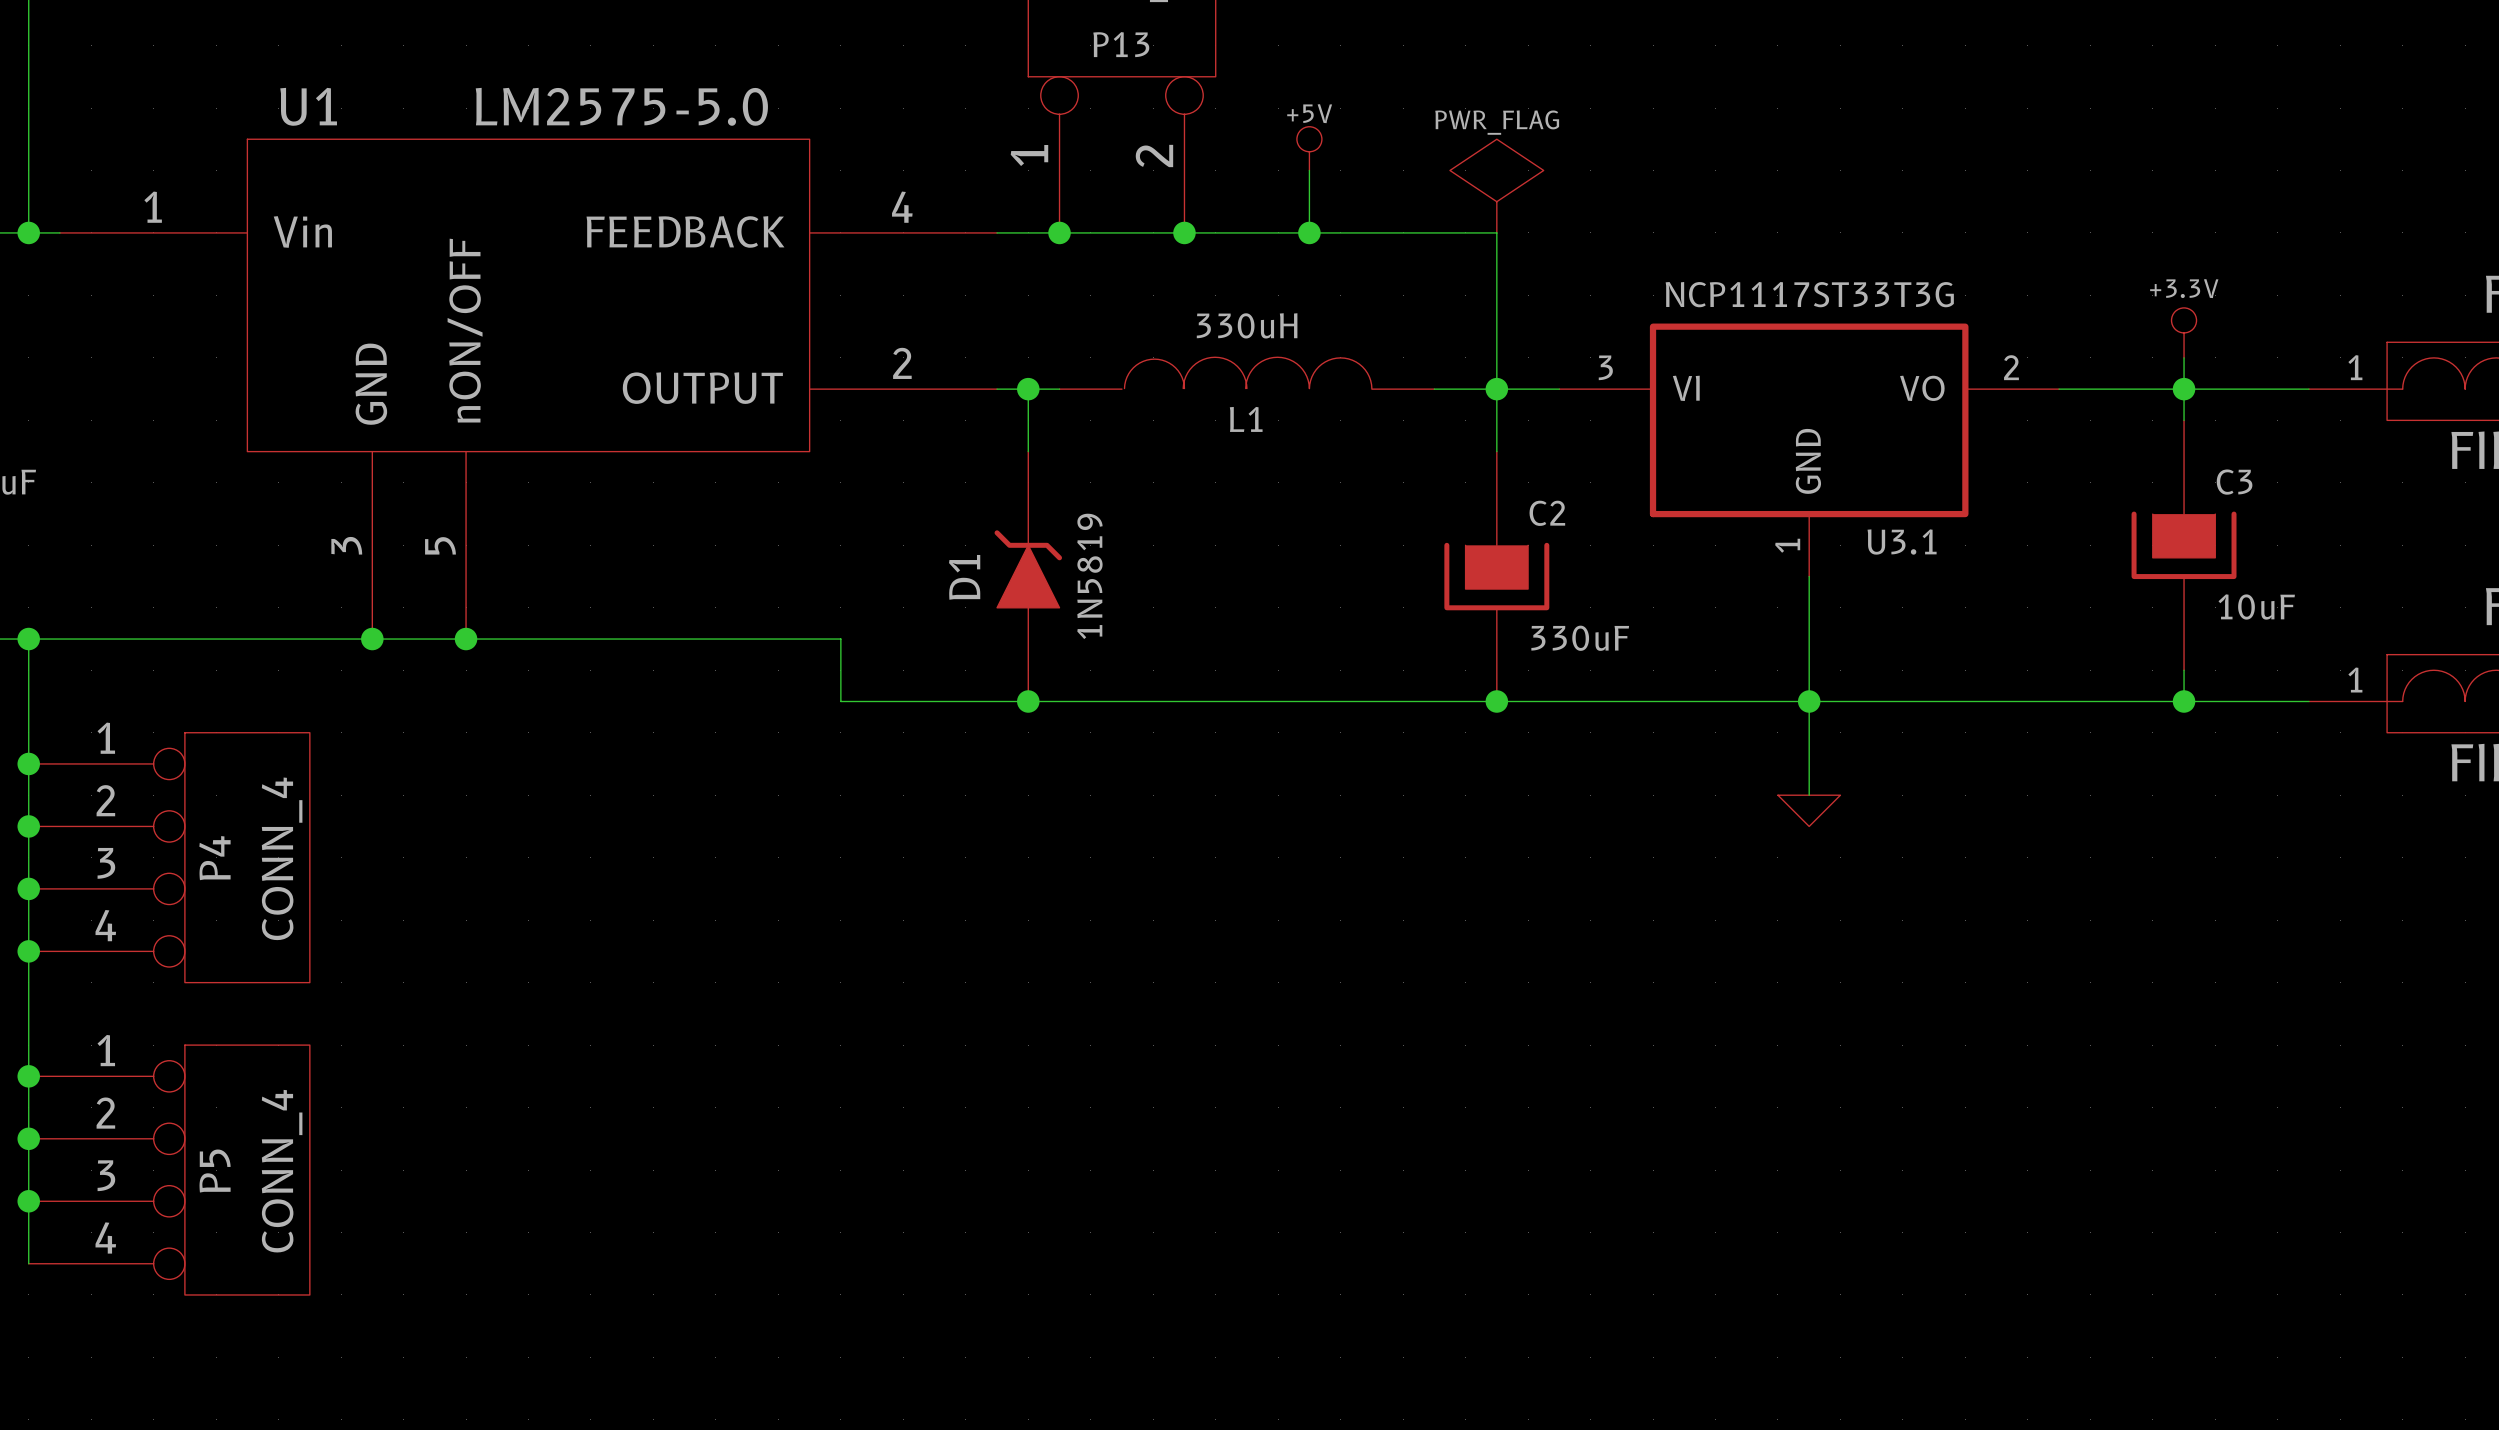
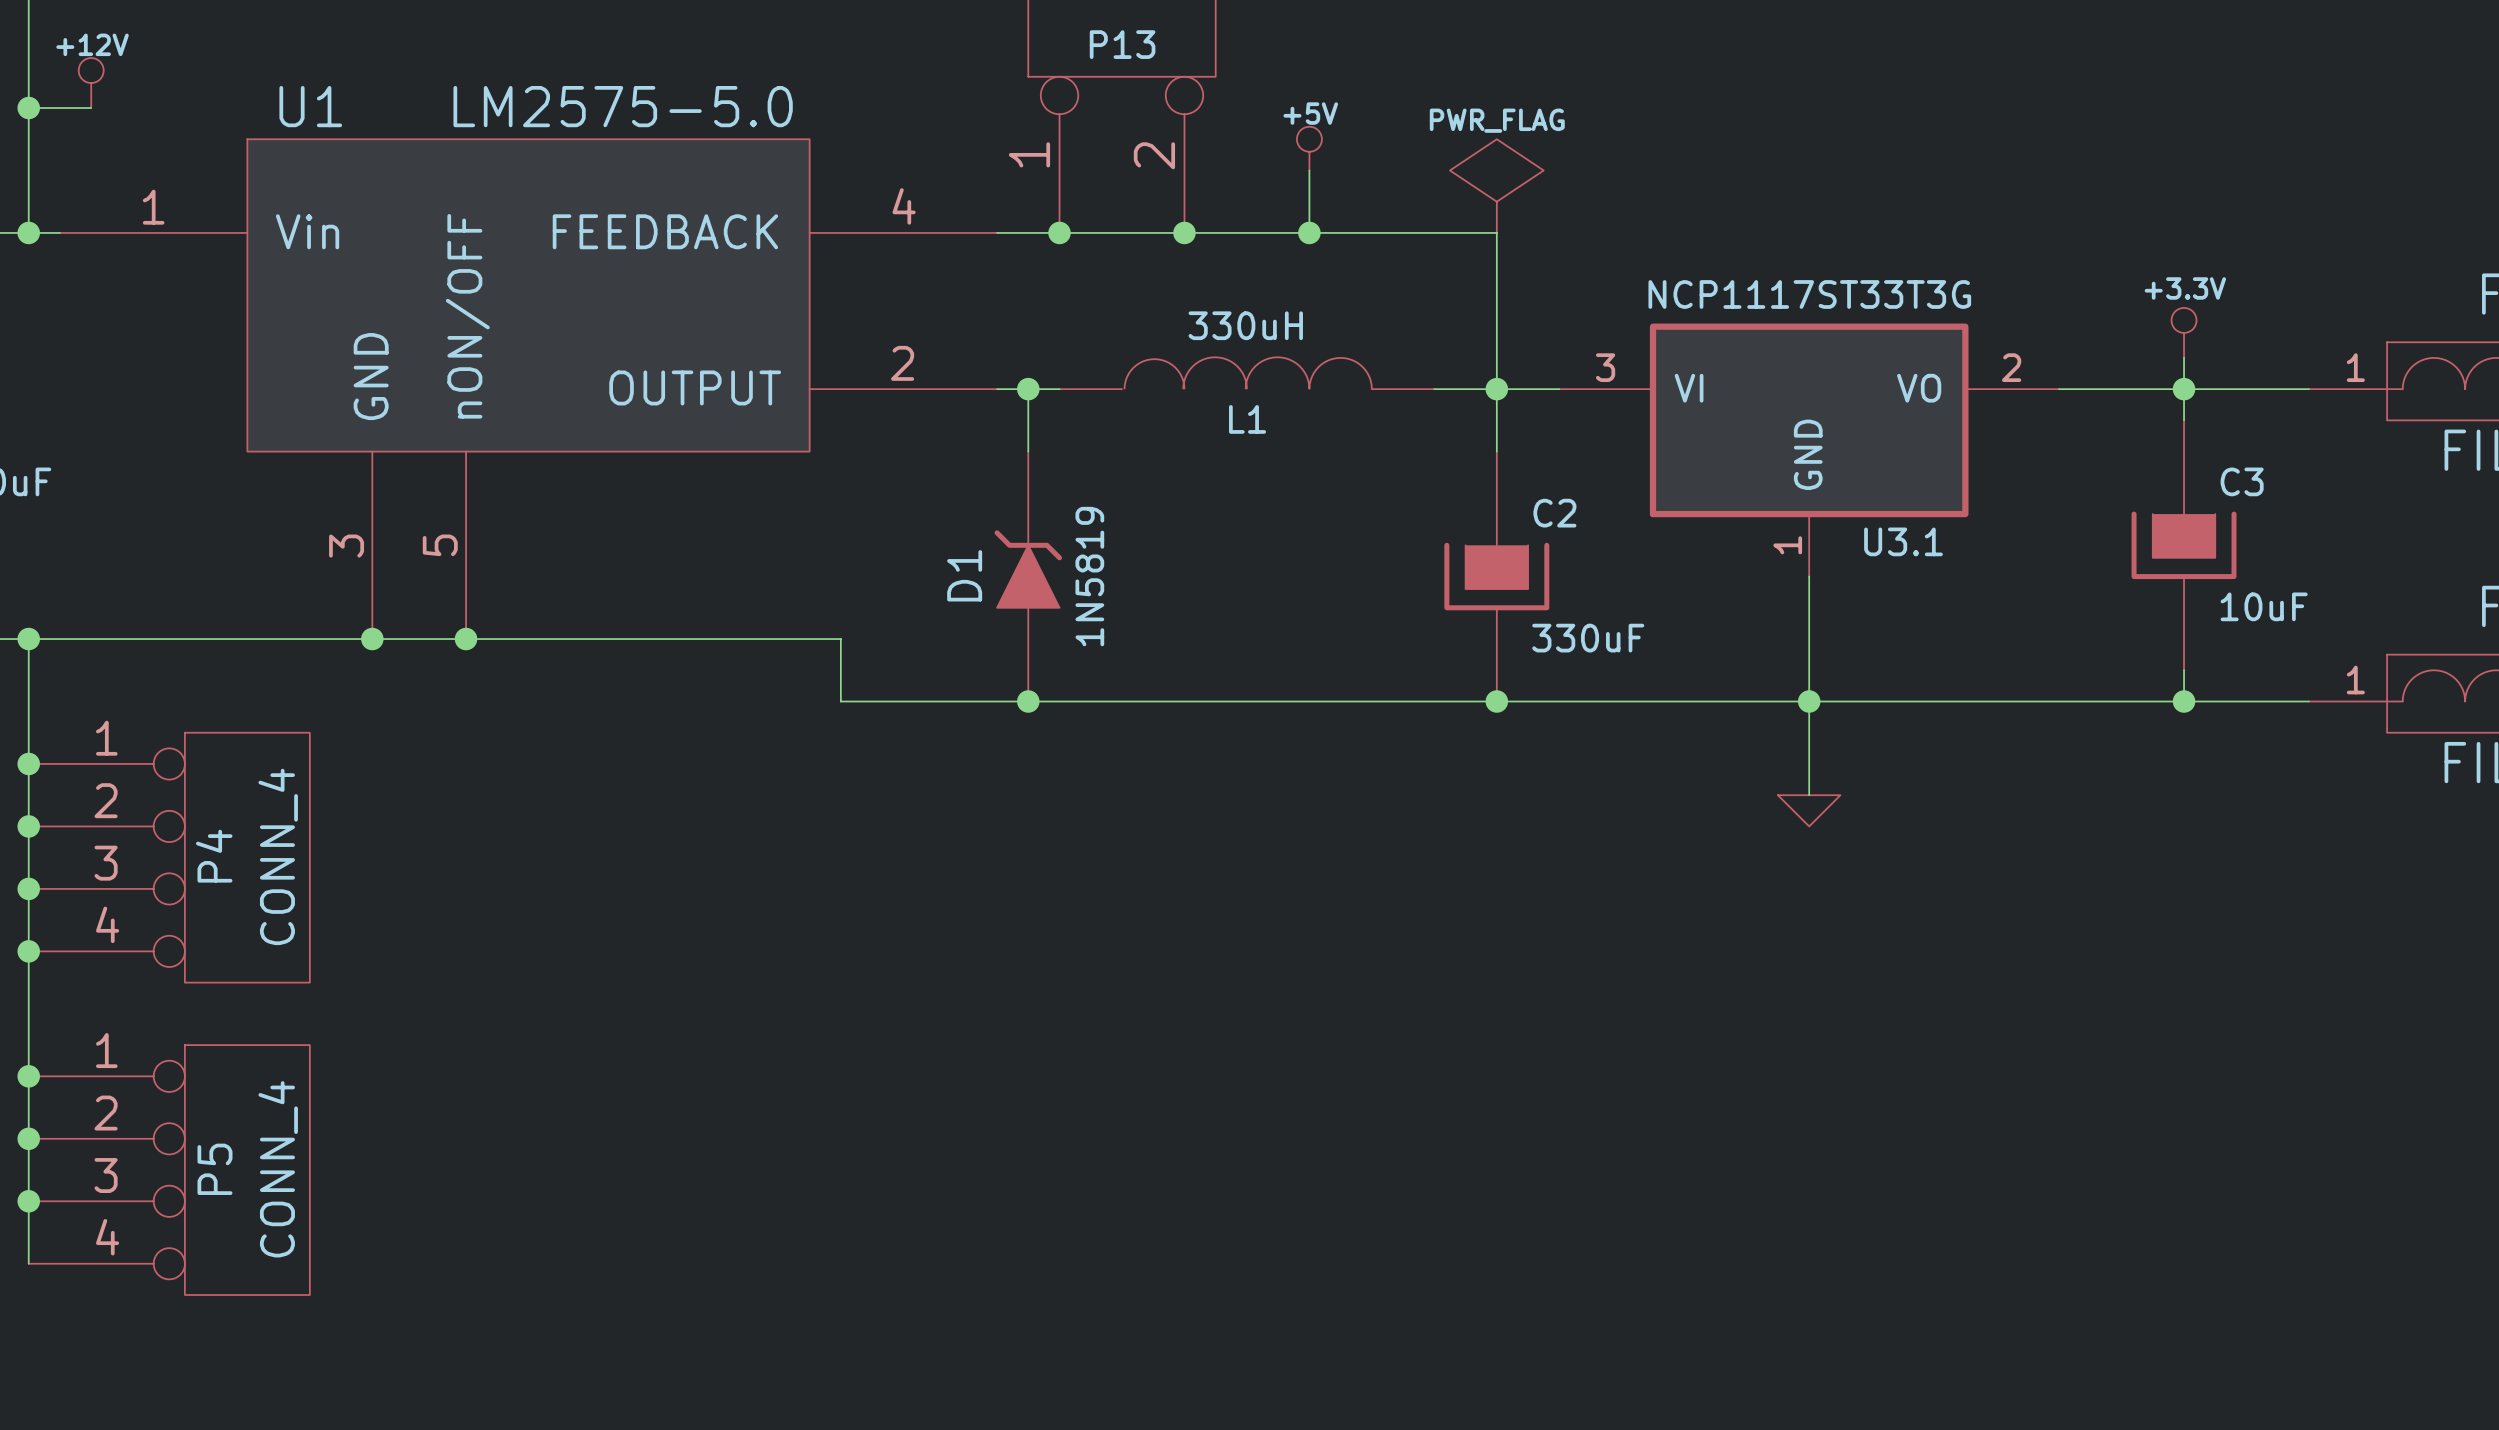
power symbol: none -> +12V (91, 83)
wire: none -> (28, 108) (91, 108)
junction: none -> (28, 108)

